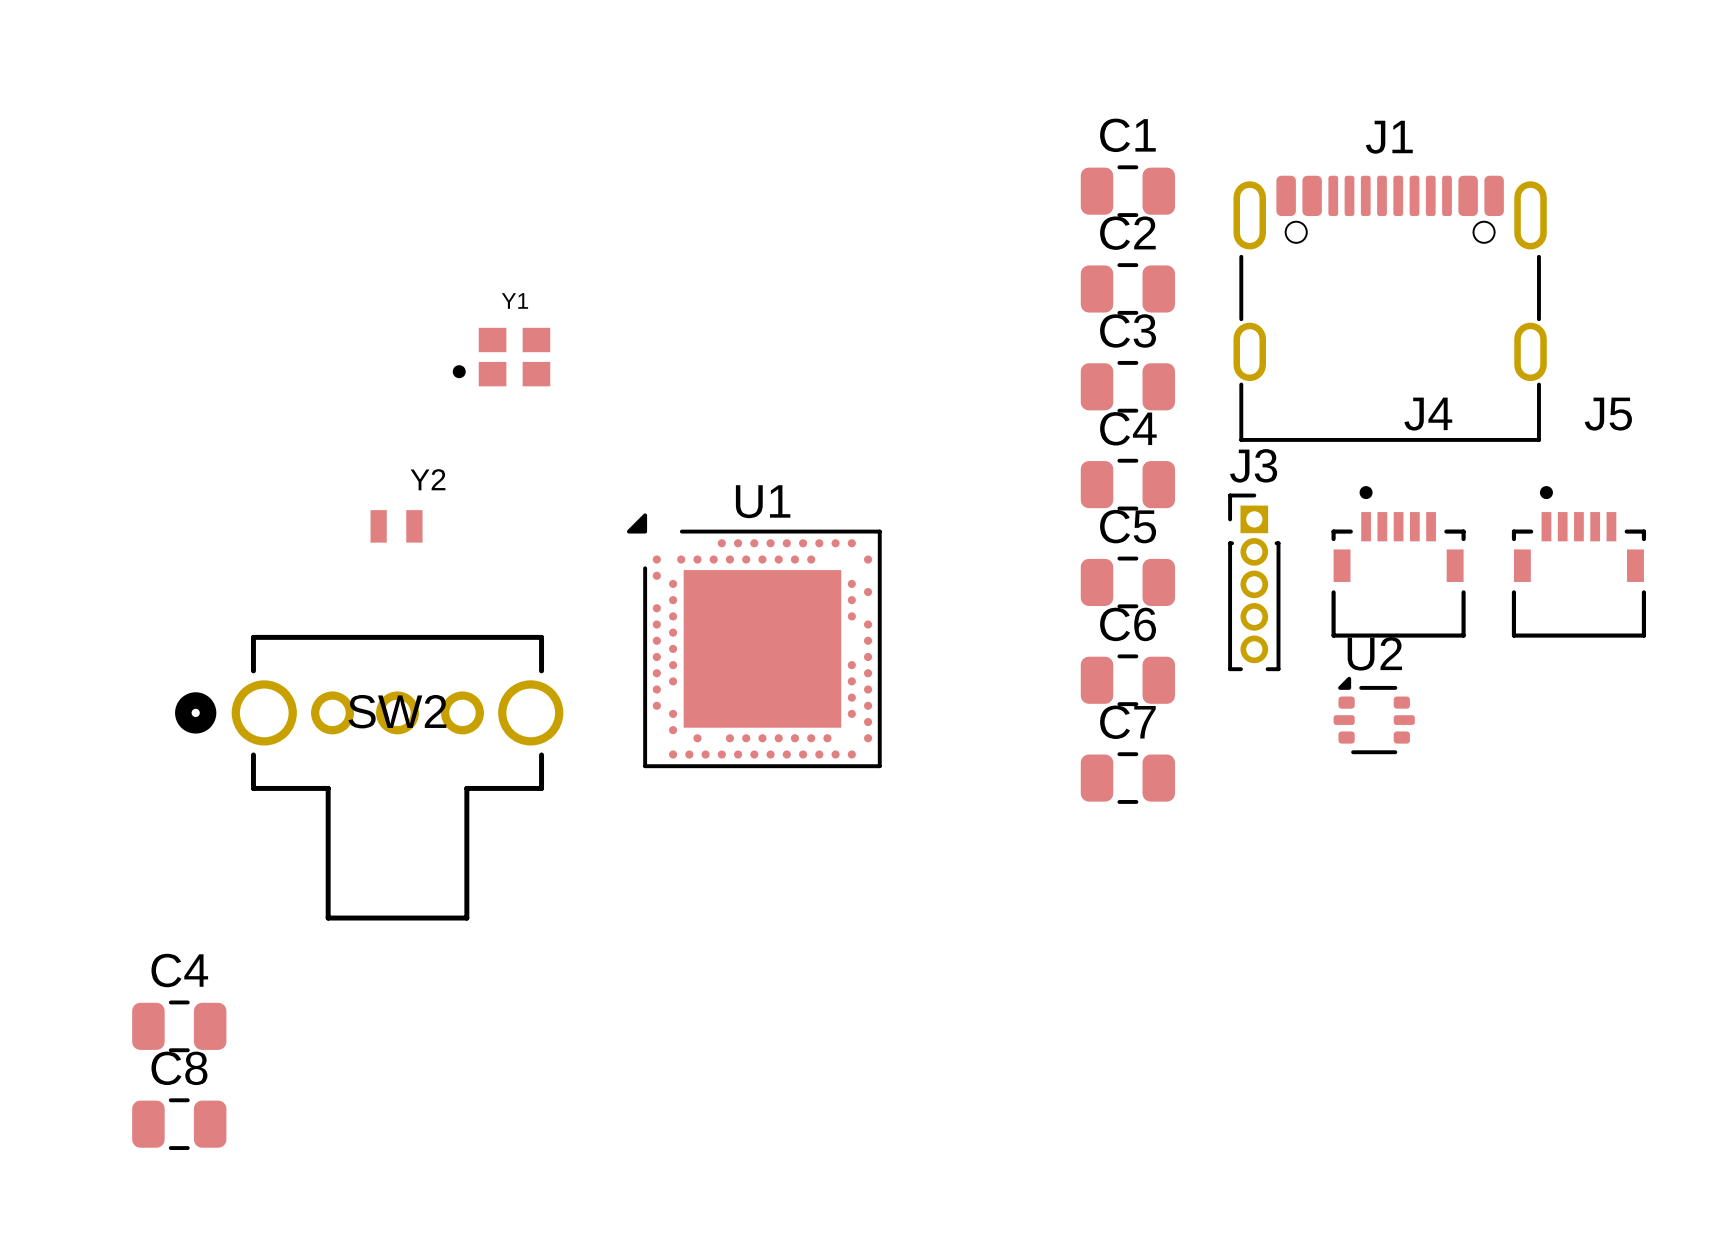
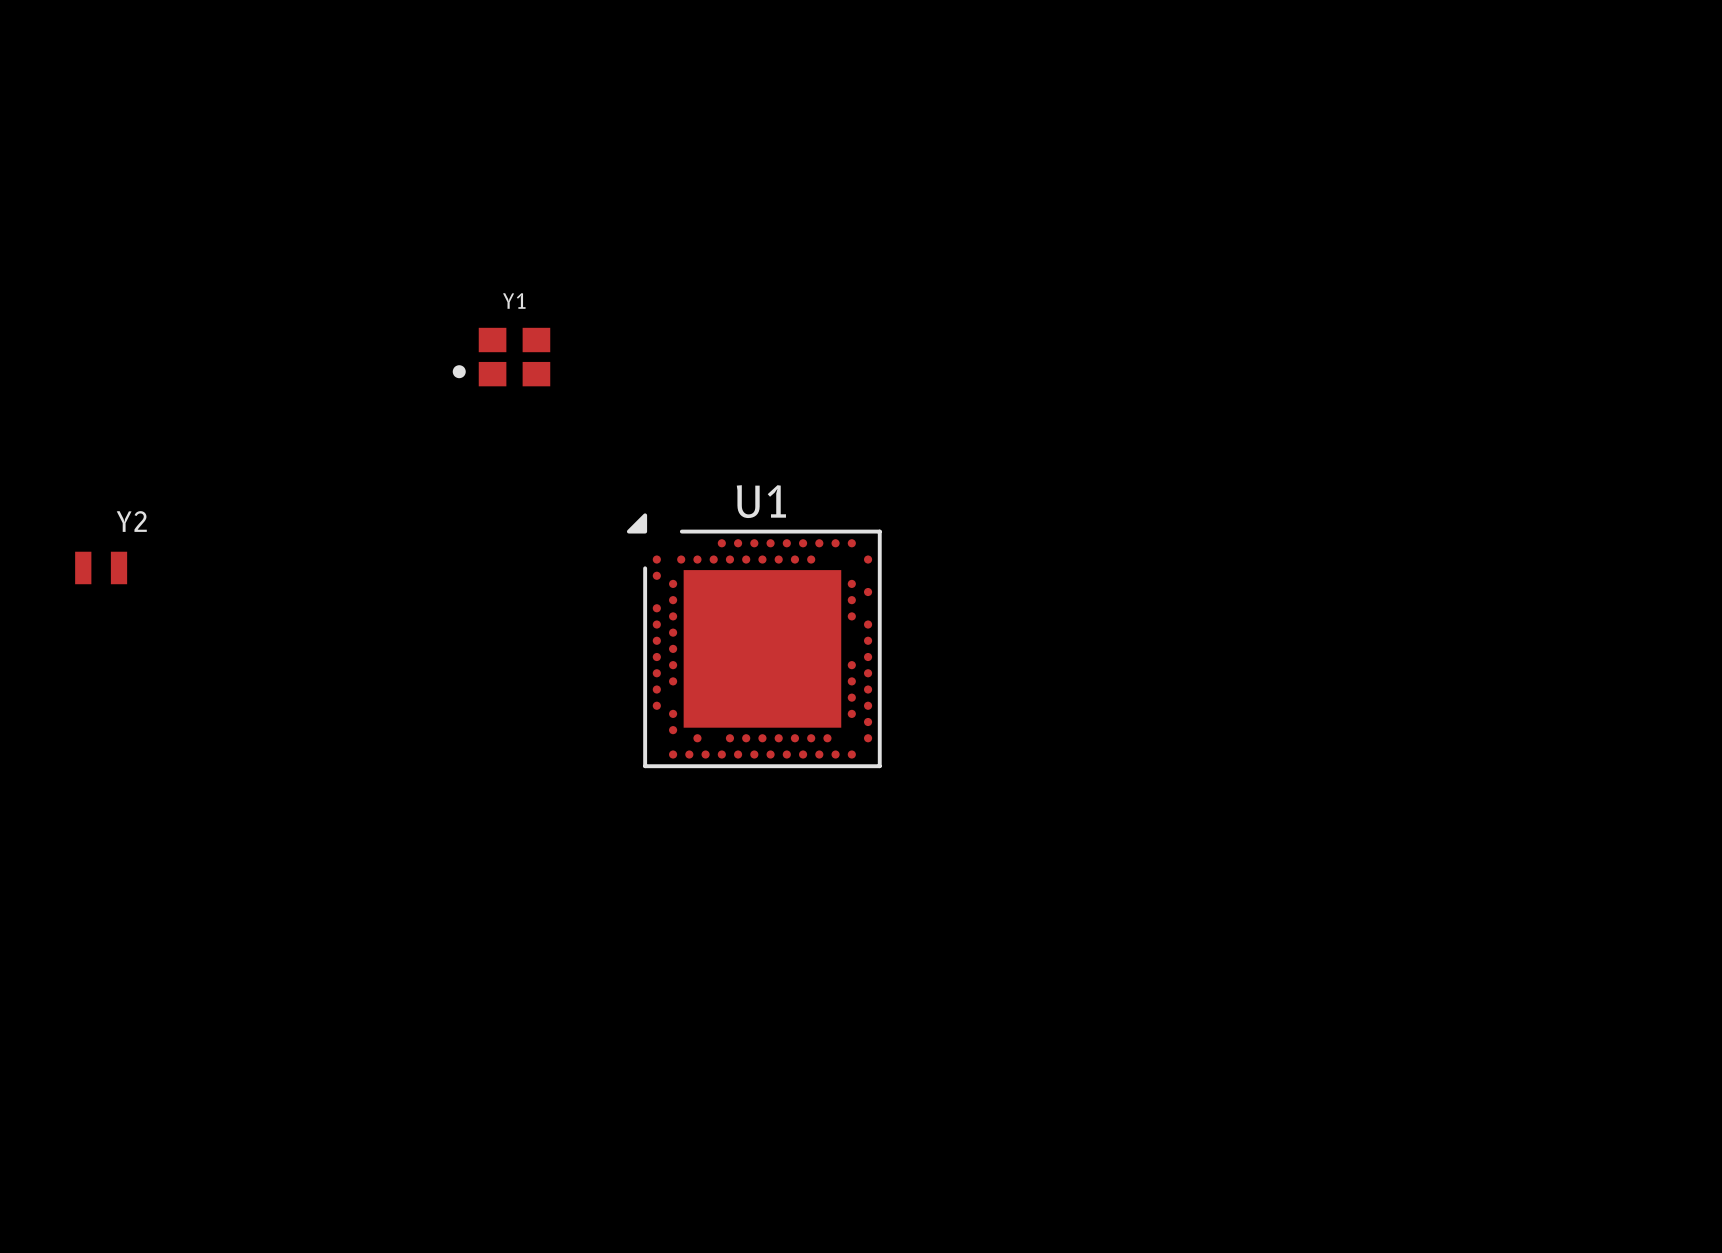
C1: (1127, 191) -> none
C2: (1127, 288) -> none
J1: (1390, 308) -> none
C3: (1127, 386) -> none
C4: (1127, 484) -> none
Y2 position: (396, 526) -> (101, 567)
J4: (1398, 561) -> none
J5: (1578, 561) -> none
C5: (1127, 582) -> none
J3: (1254, 582) -> none
C6: (1127, 680) -> none
U2: (1374, 715) -> none
SW2: (369, 777) -> none
C7: (1127, 778) -> none
C4: (179, 1026) -> none
C8: (179, 1124) -> none

